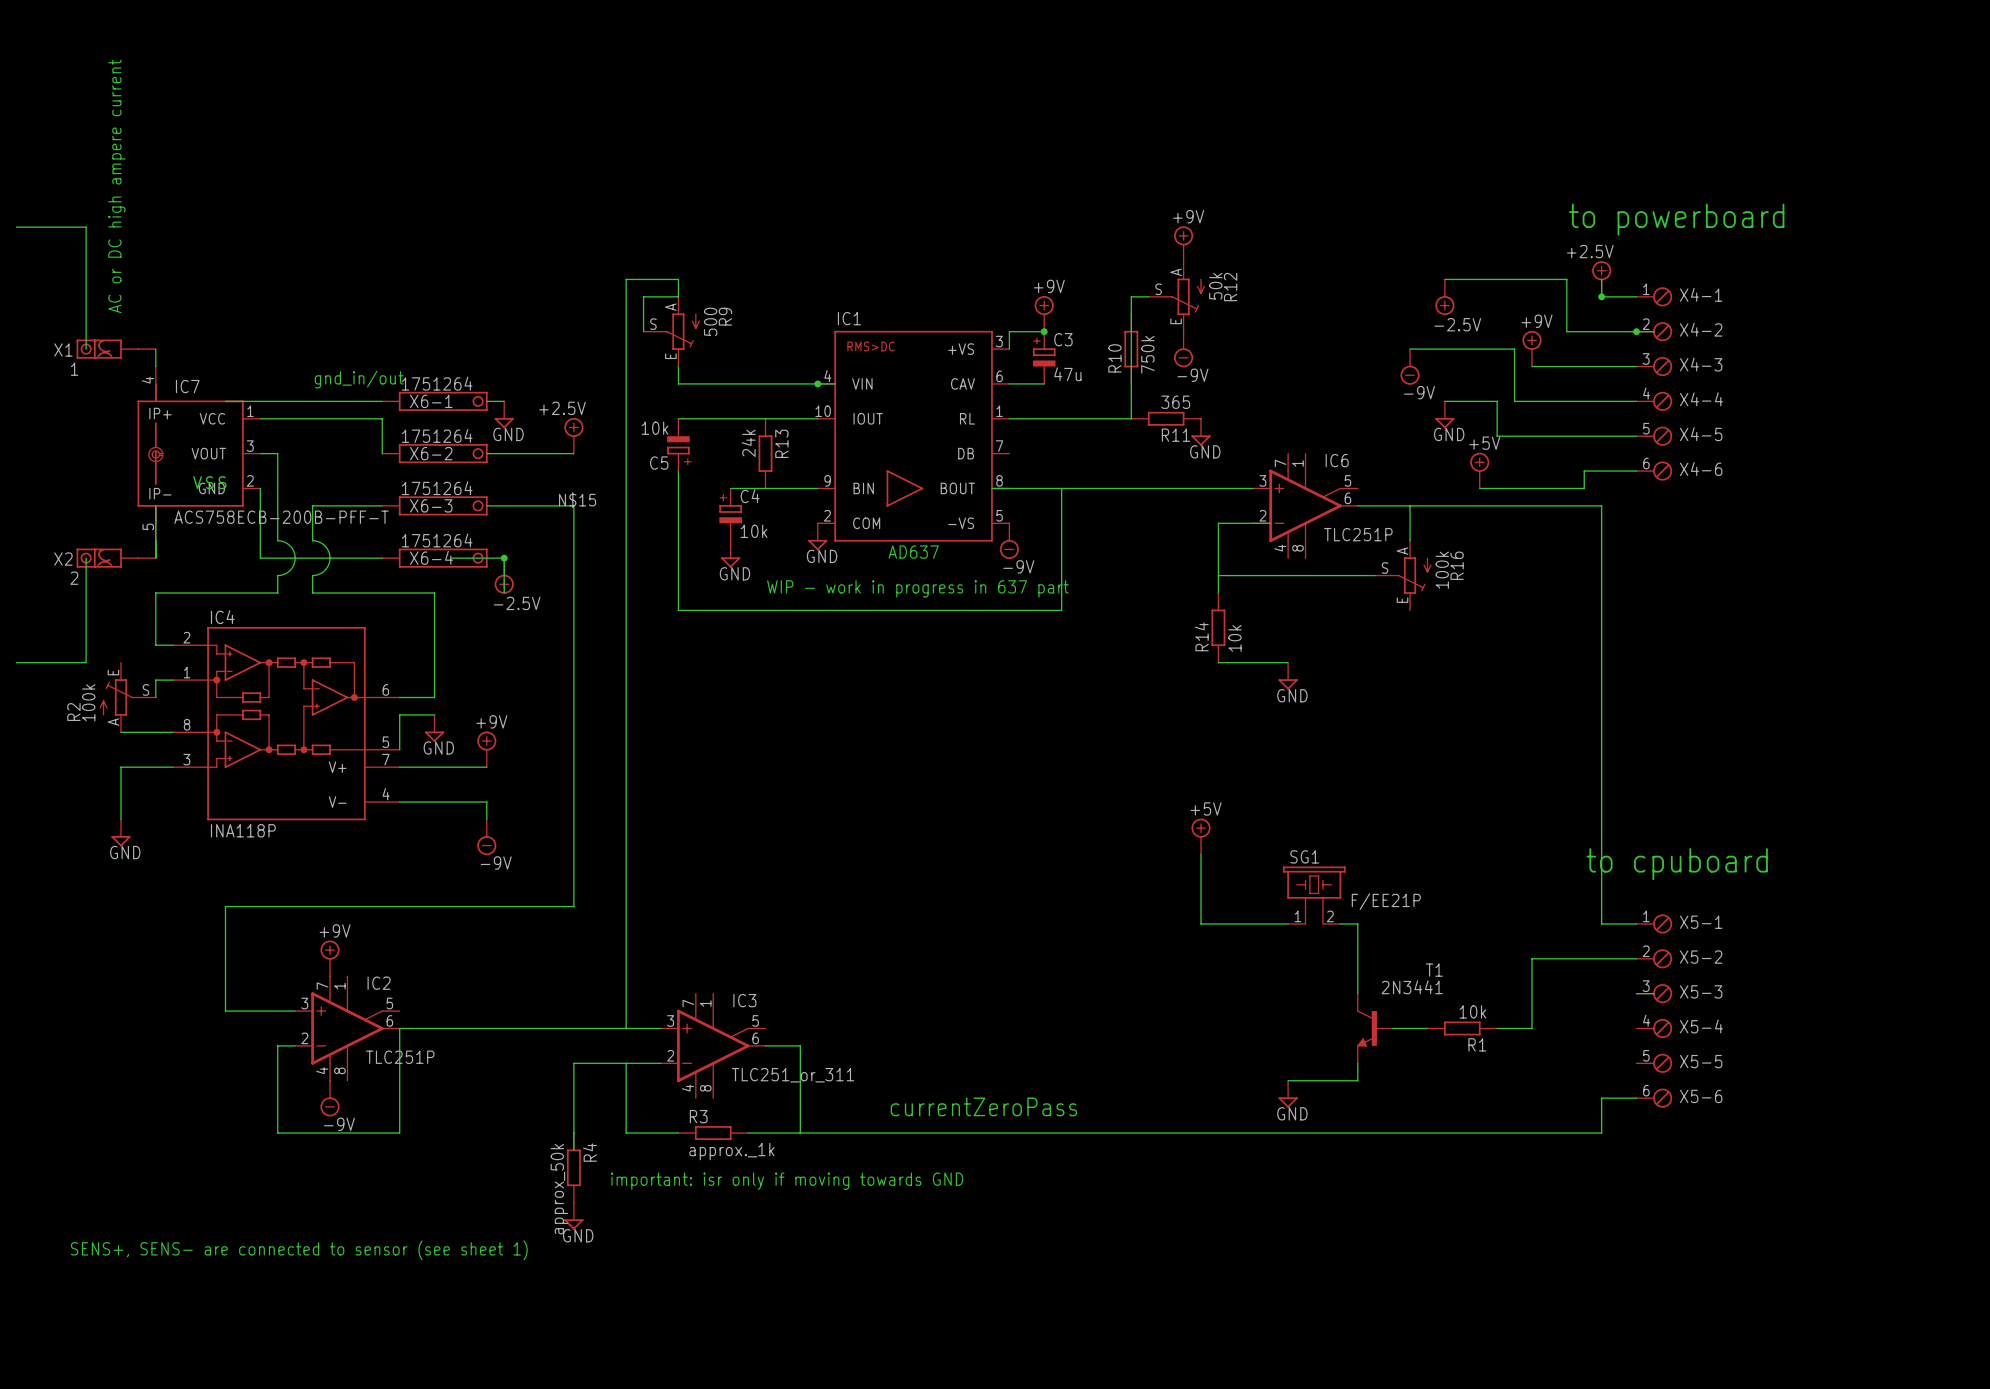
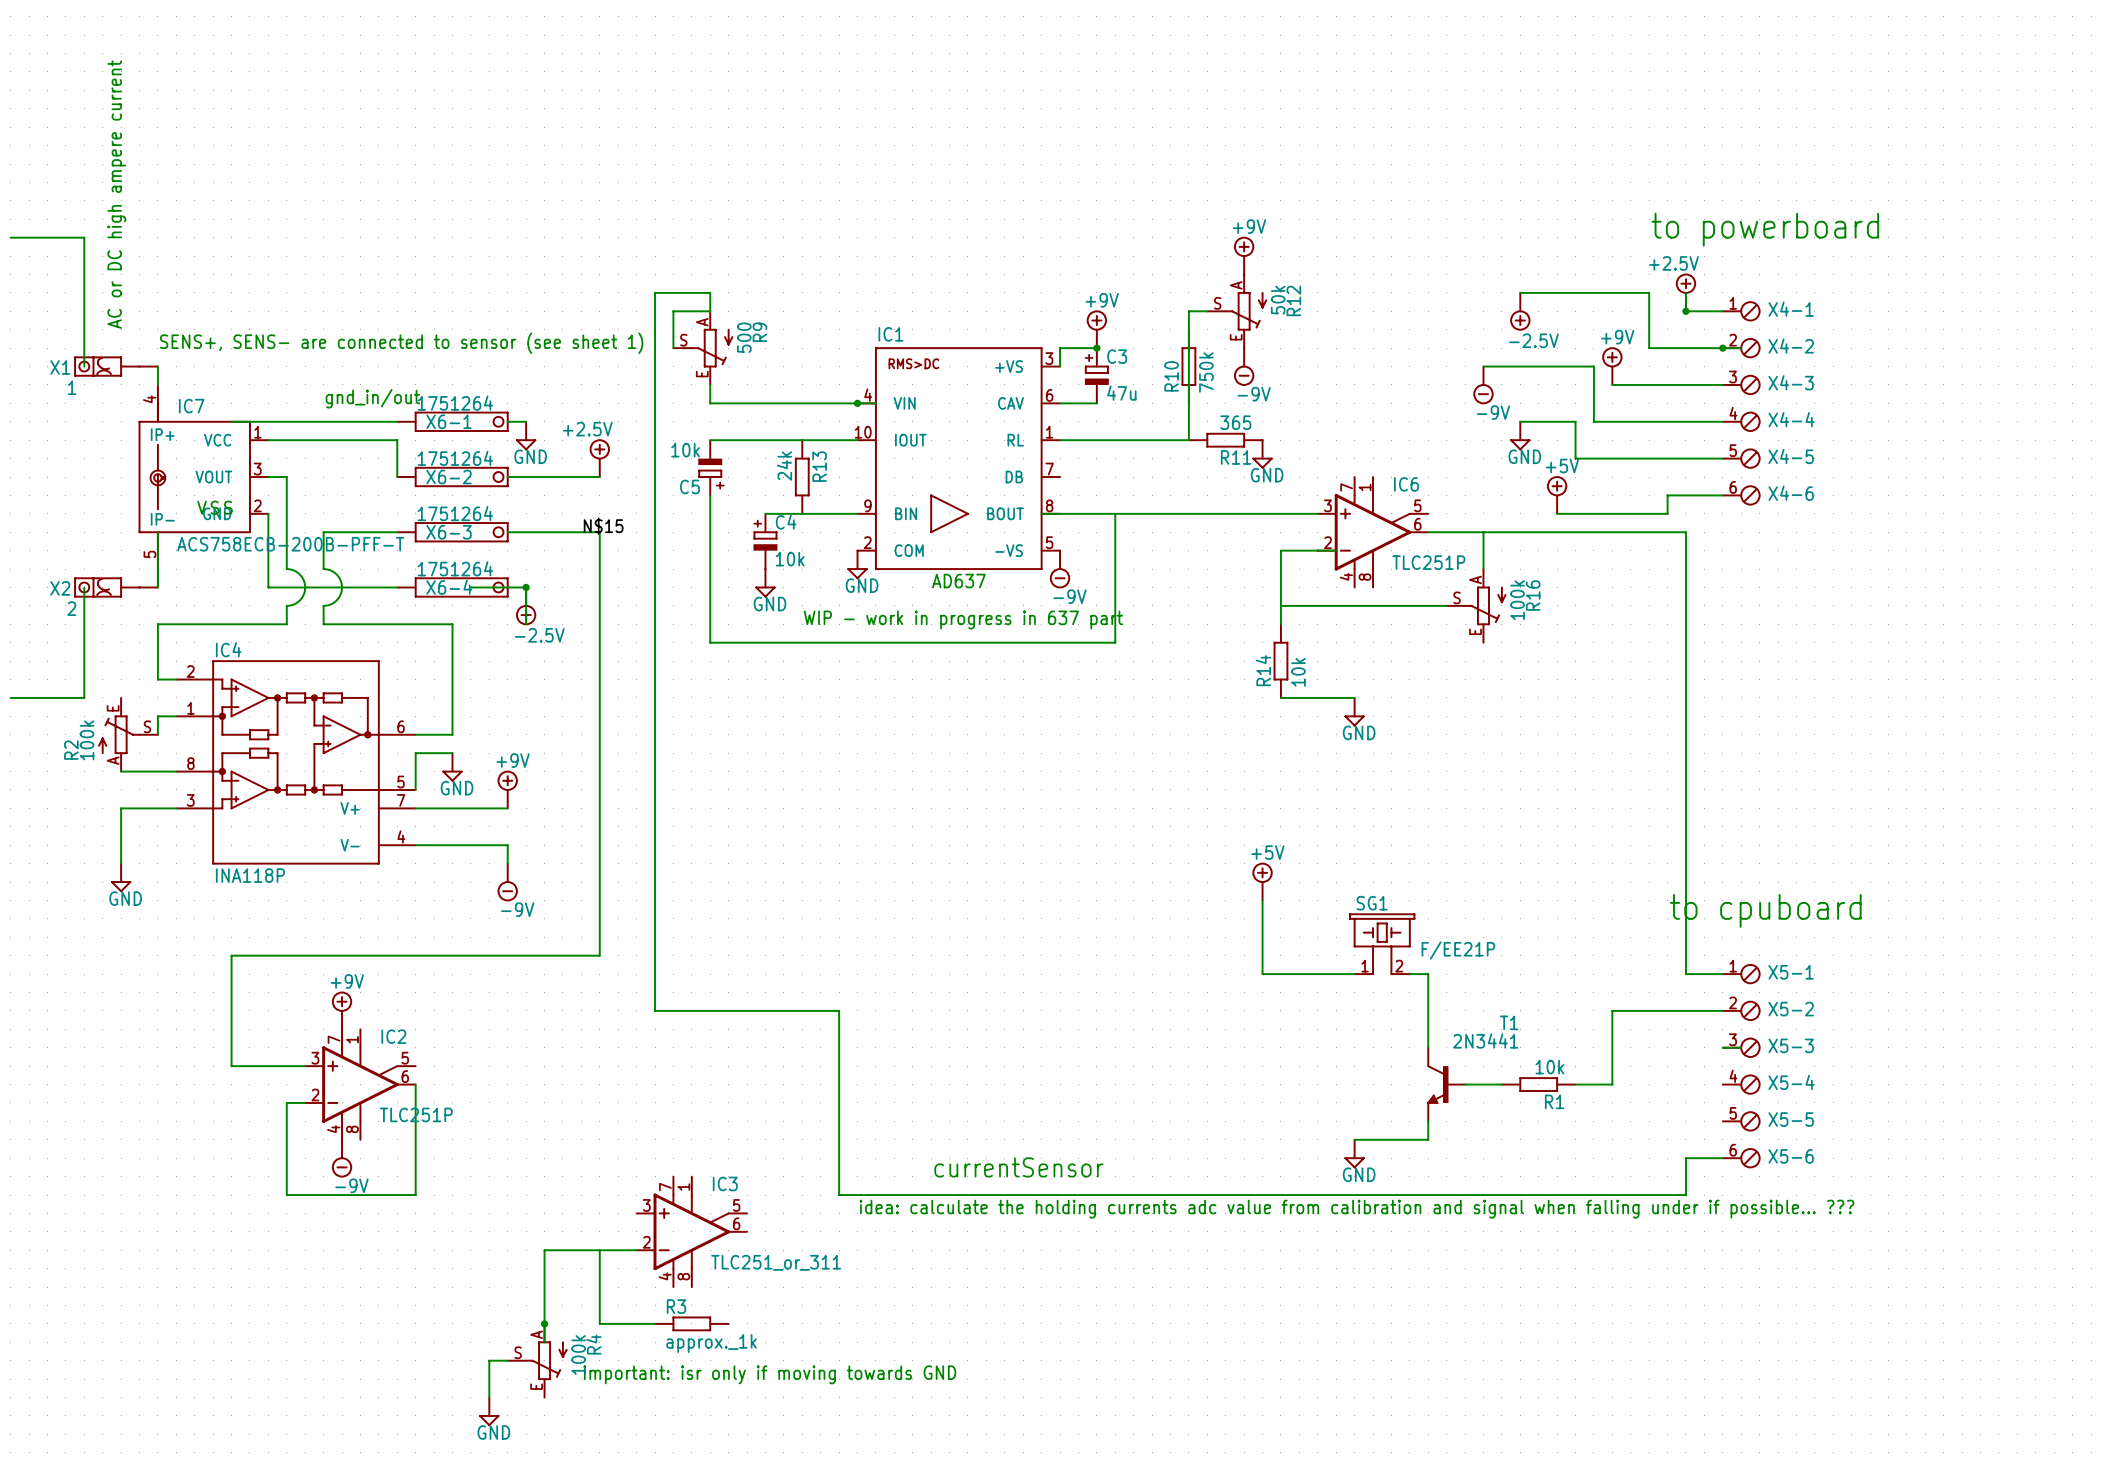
text: none -> SENS+, SENS- are connected to sensor (see sheet 1) (401, 343)
wire: (626, 958) (626, 1028) -> none
wire: (399, 1028) (660, 1028) -> none
IC3 position: (713, 1045) -> (691, 1231)
wire: (765, 1045) (800, 1045) -> (655, 1010) (839, 1010) (839, 1102)
wire: (626, 1063) (626, 1133) (678, 1133) -> (599, 1250) (599, 1323) (655, 1323)
wire: (660, 1063) (573, 1063) (573, 1150) -> (636, 1250) (544, 1250) (544, 1342)
text: currentZeroPass (983, 1106) -> currentSensor (1018, 1167)
R4 symbol: [566, 1133, 581, 1203] -> [507, 1323, 568, 1398]
R3 position: (713, 1133) -> (691, 1323)
wire: (748, 1133) (800, 1133) -> none
text: none -> idea: calculate the holding currents adc value from calibration and signal when falling under if possible... ??? (1356, 1209)
R4 name position: R4 (589, 1152) -> R4 (593, 1344)
text position: important: isr only if moving towards GND (787, 1181) -> important: isr only if moving towards GND (769, 1374)
R4 value: approx_50k (559, 1189) -> 100k (578, 1355)
power symbol position: GND (573, 1216) -> GND (489, 1411)
text: SENS+, SENS- are connected to sensor (see sheet 1) (299, 1250) -> none
junction: none -> (544, 1323)
wire: none -> (507, 1360) (489, 1360) (489, 1397)

